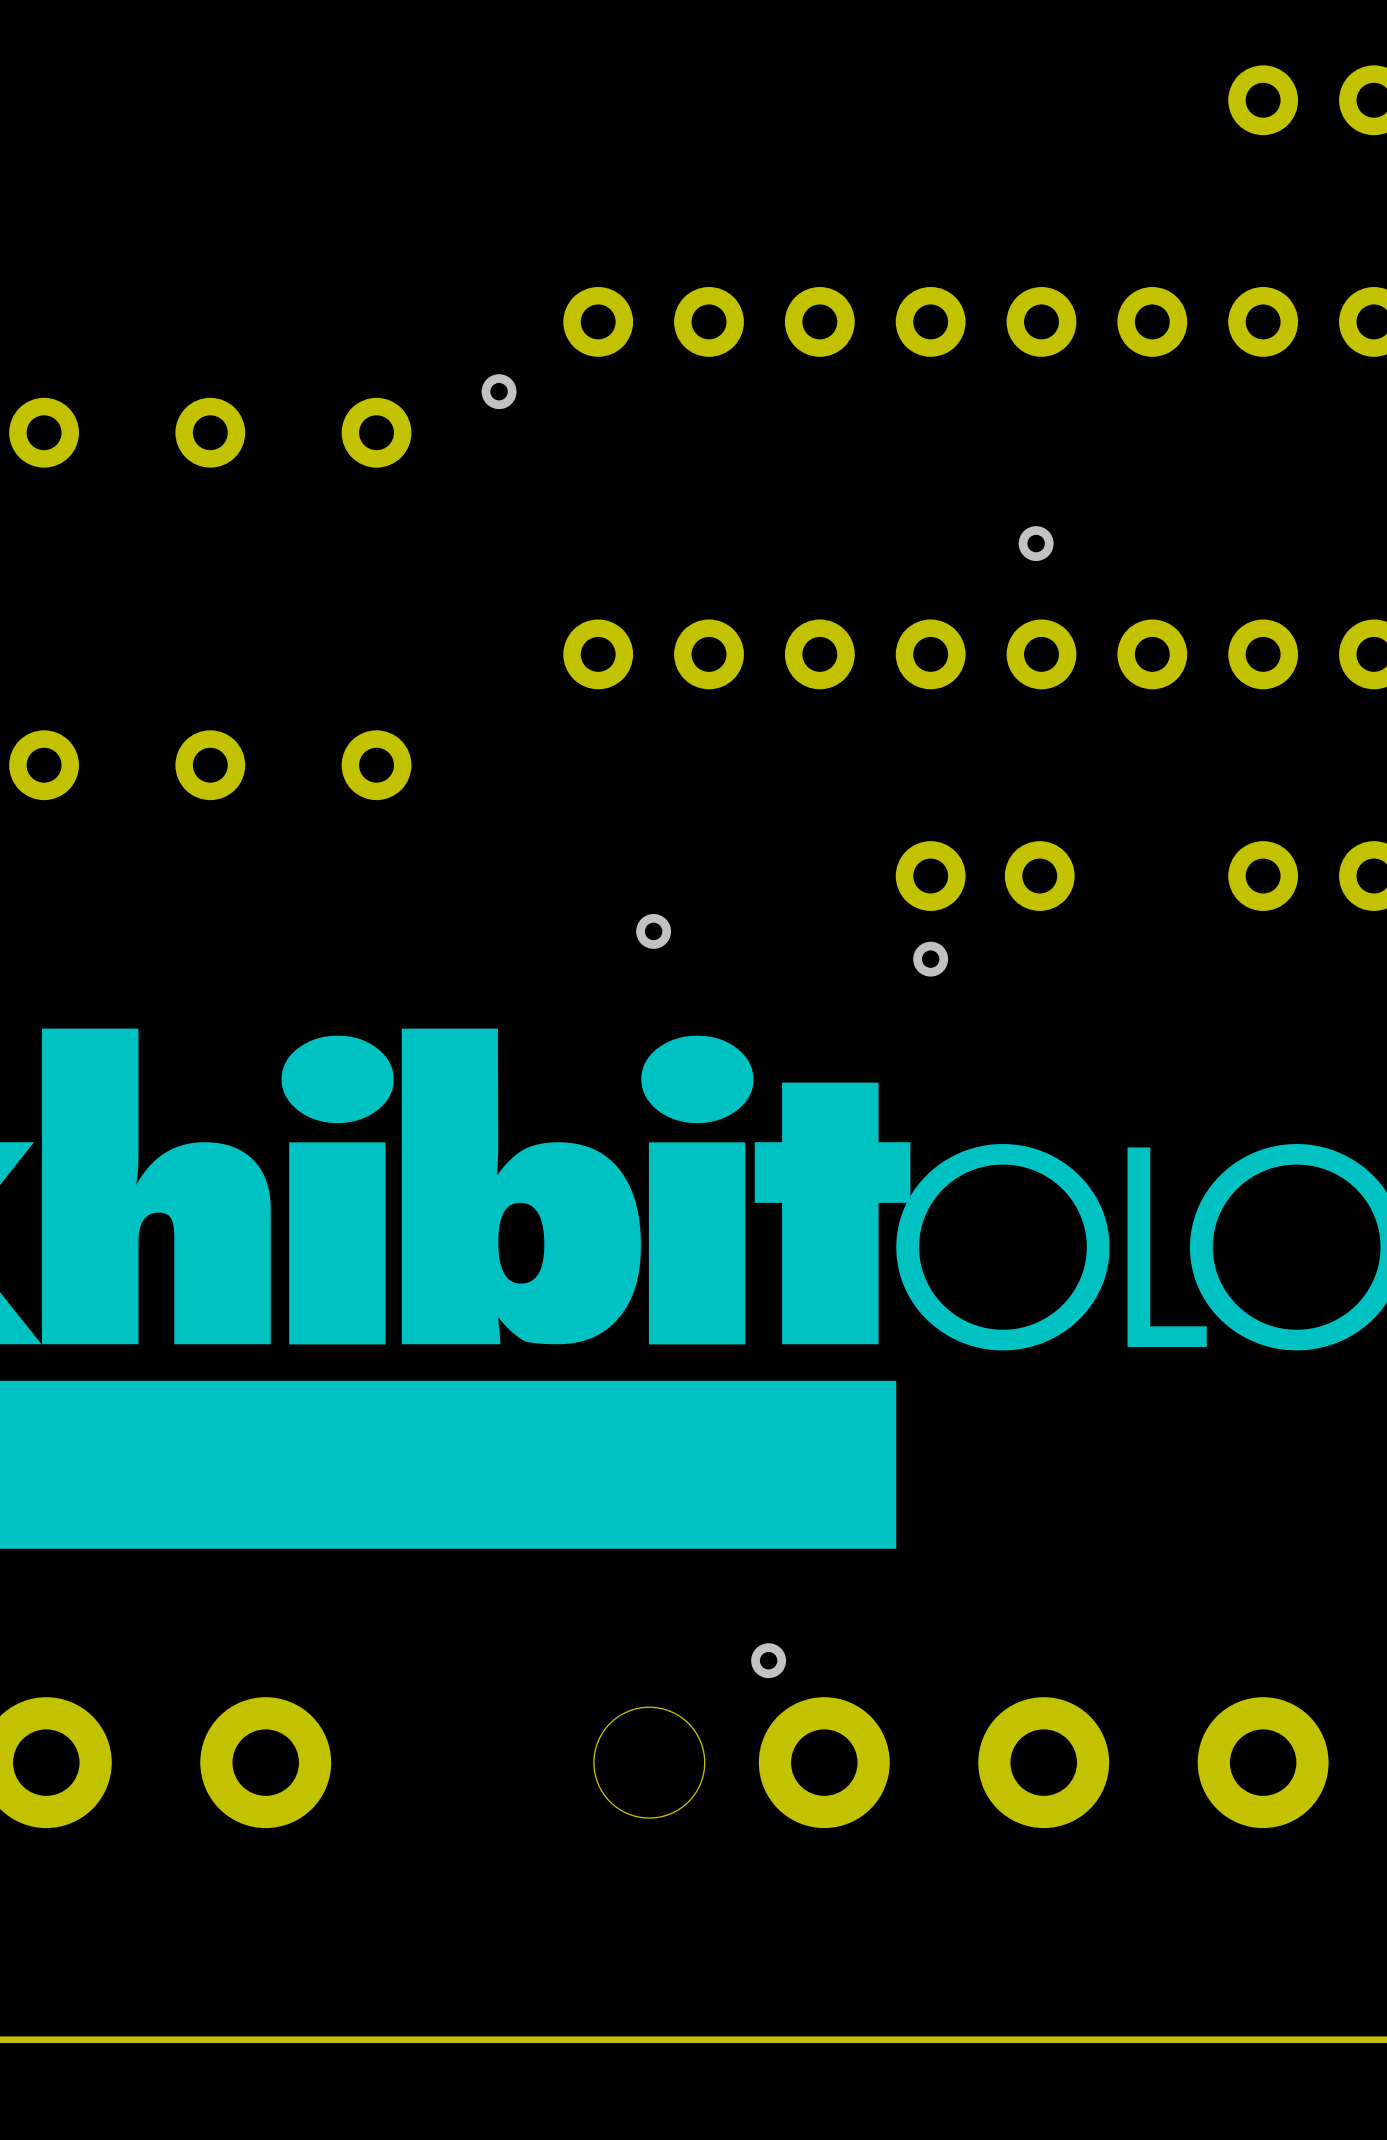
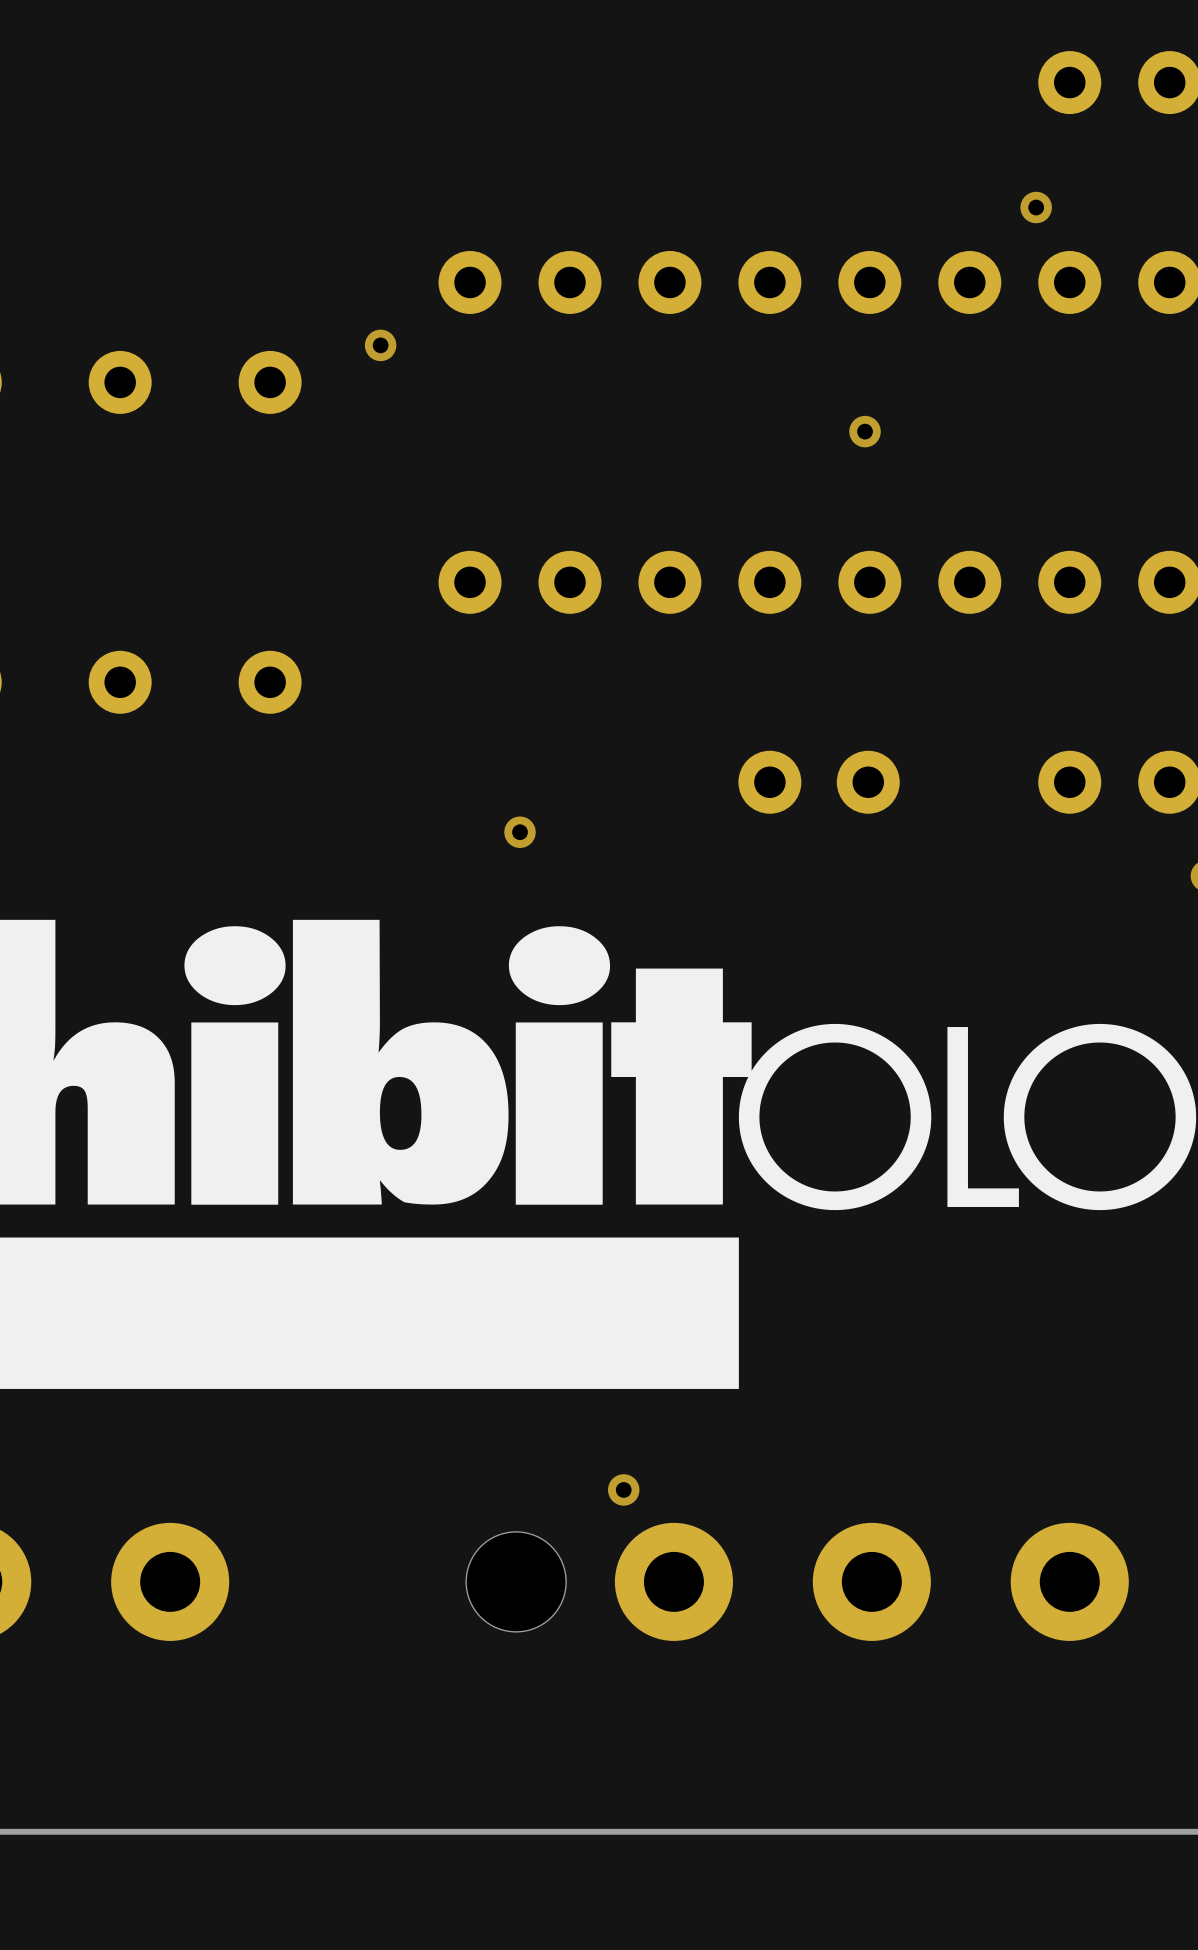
via: none -> (1036, 207)
via position: (1036, 543) -> (865, 431)
via: (930, 959) -> none

